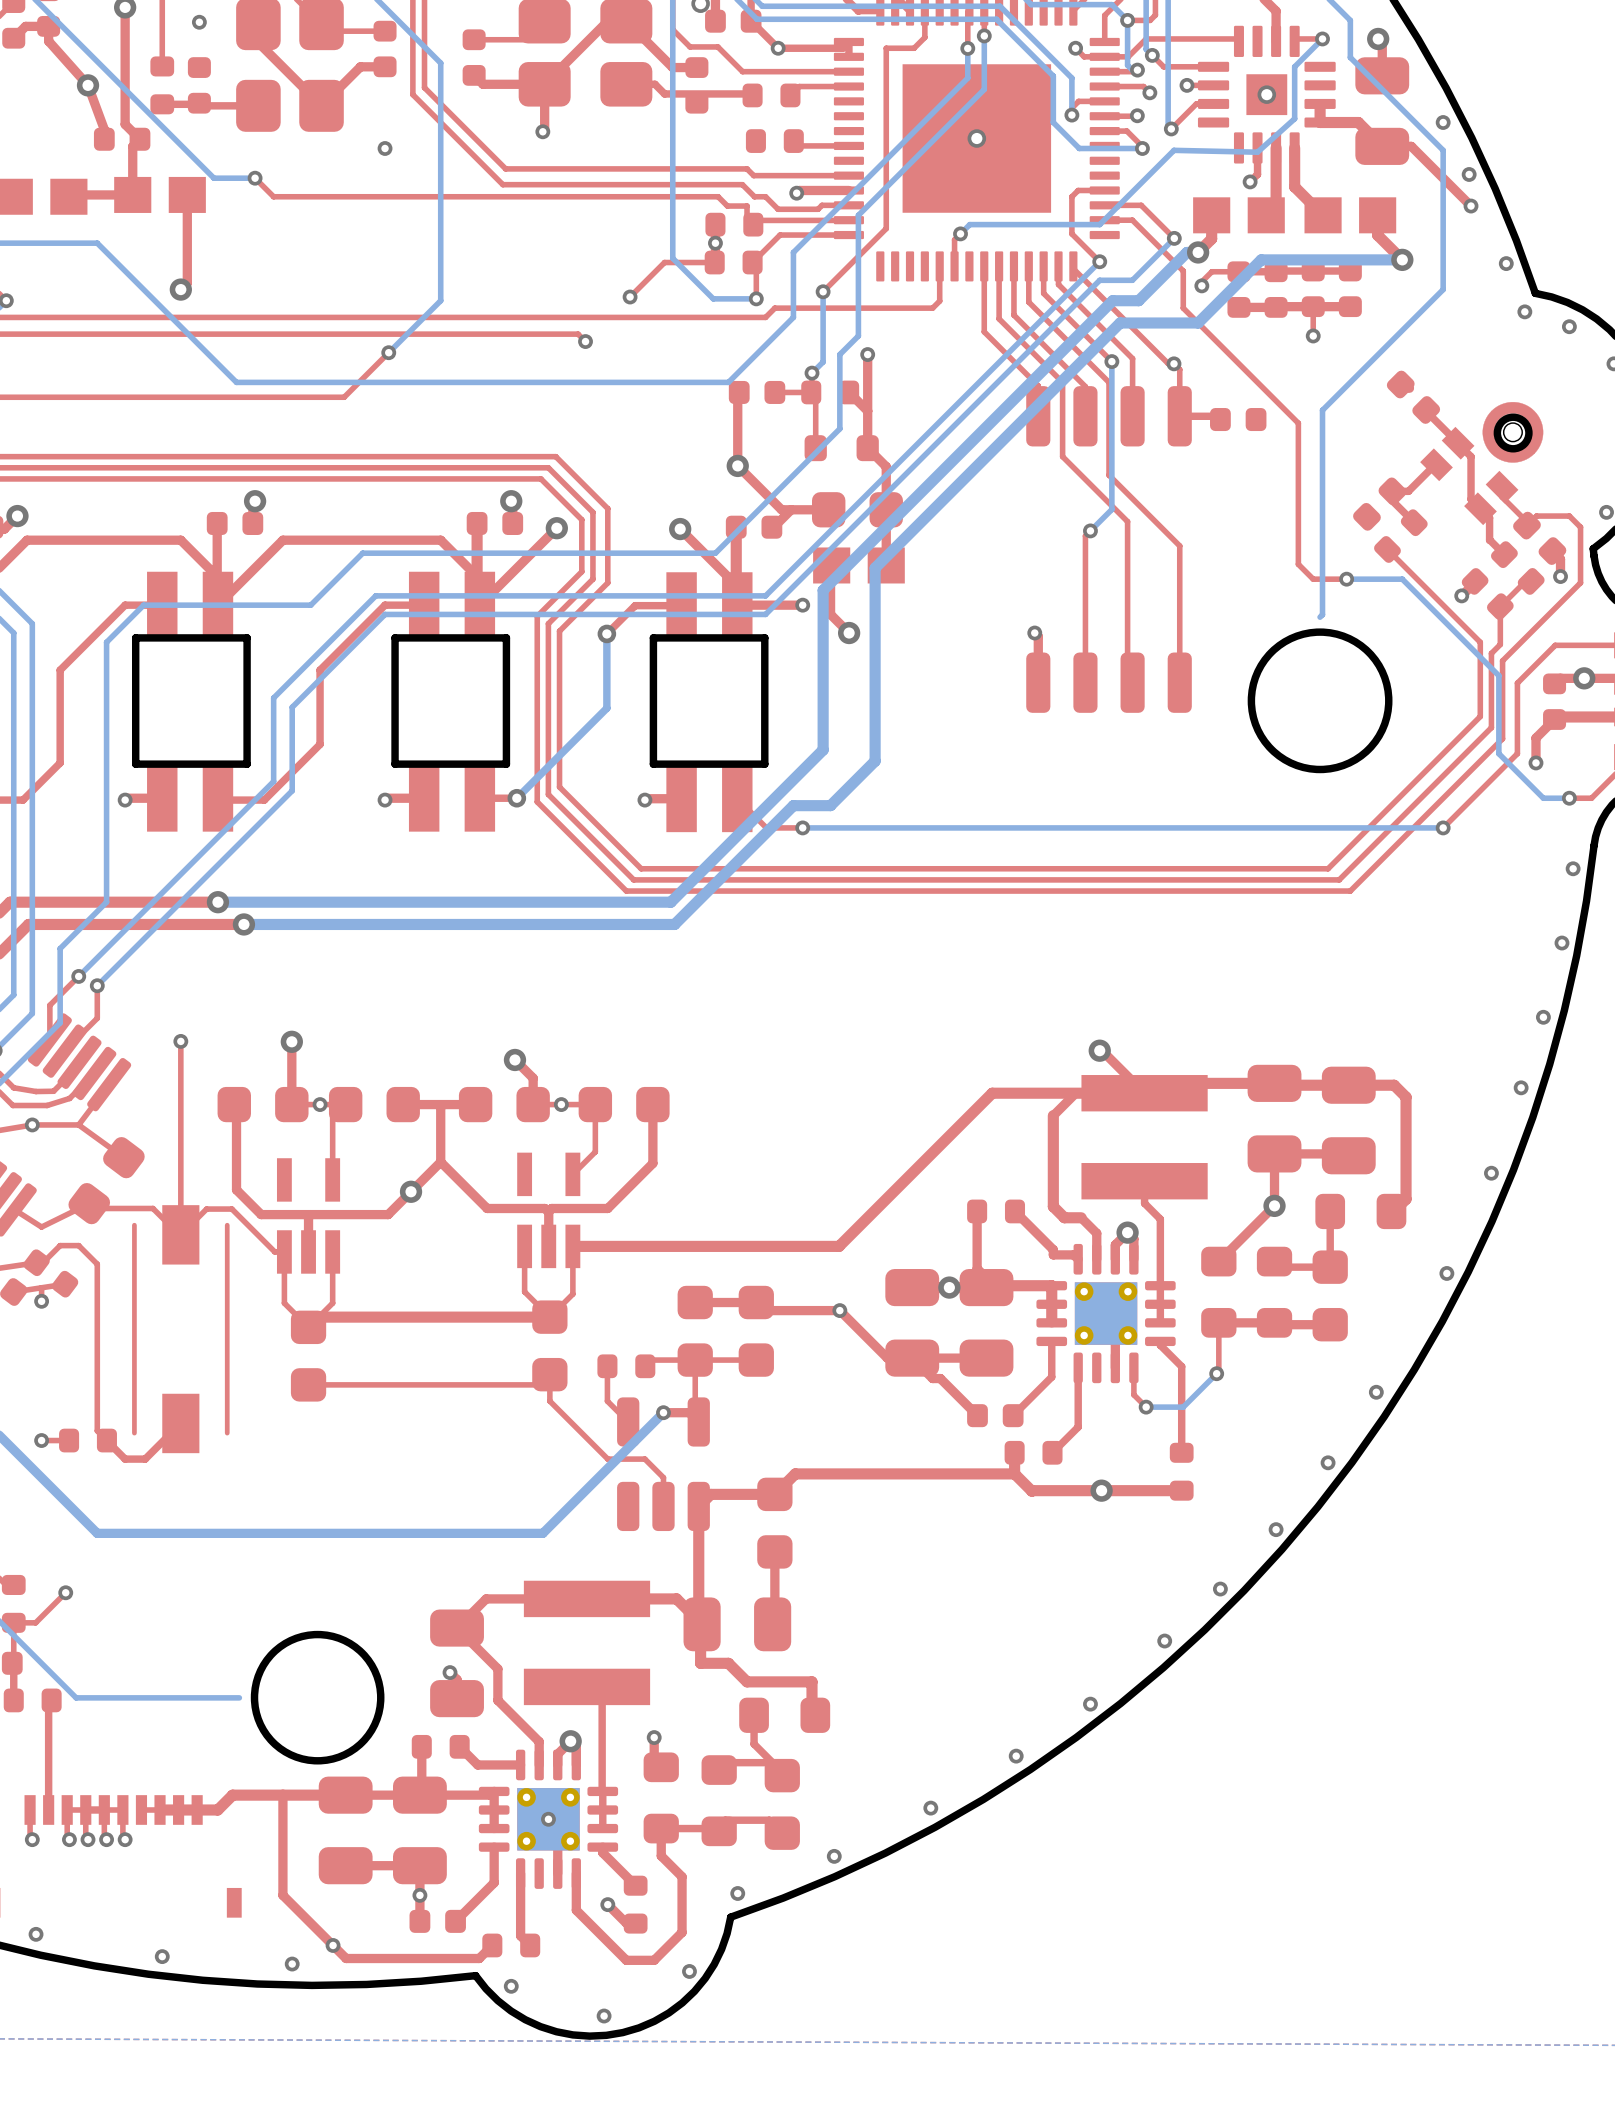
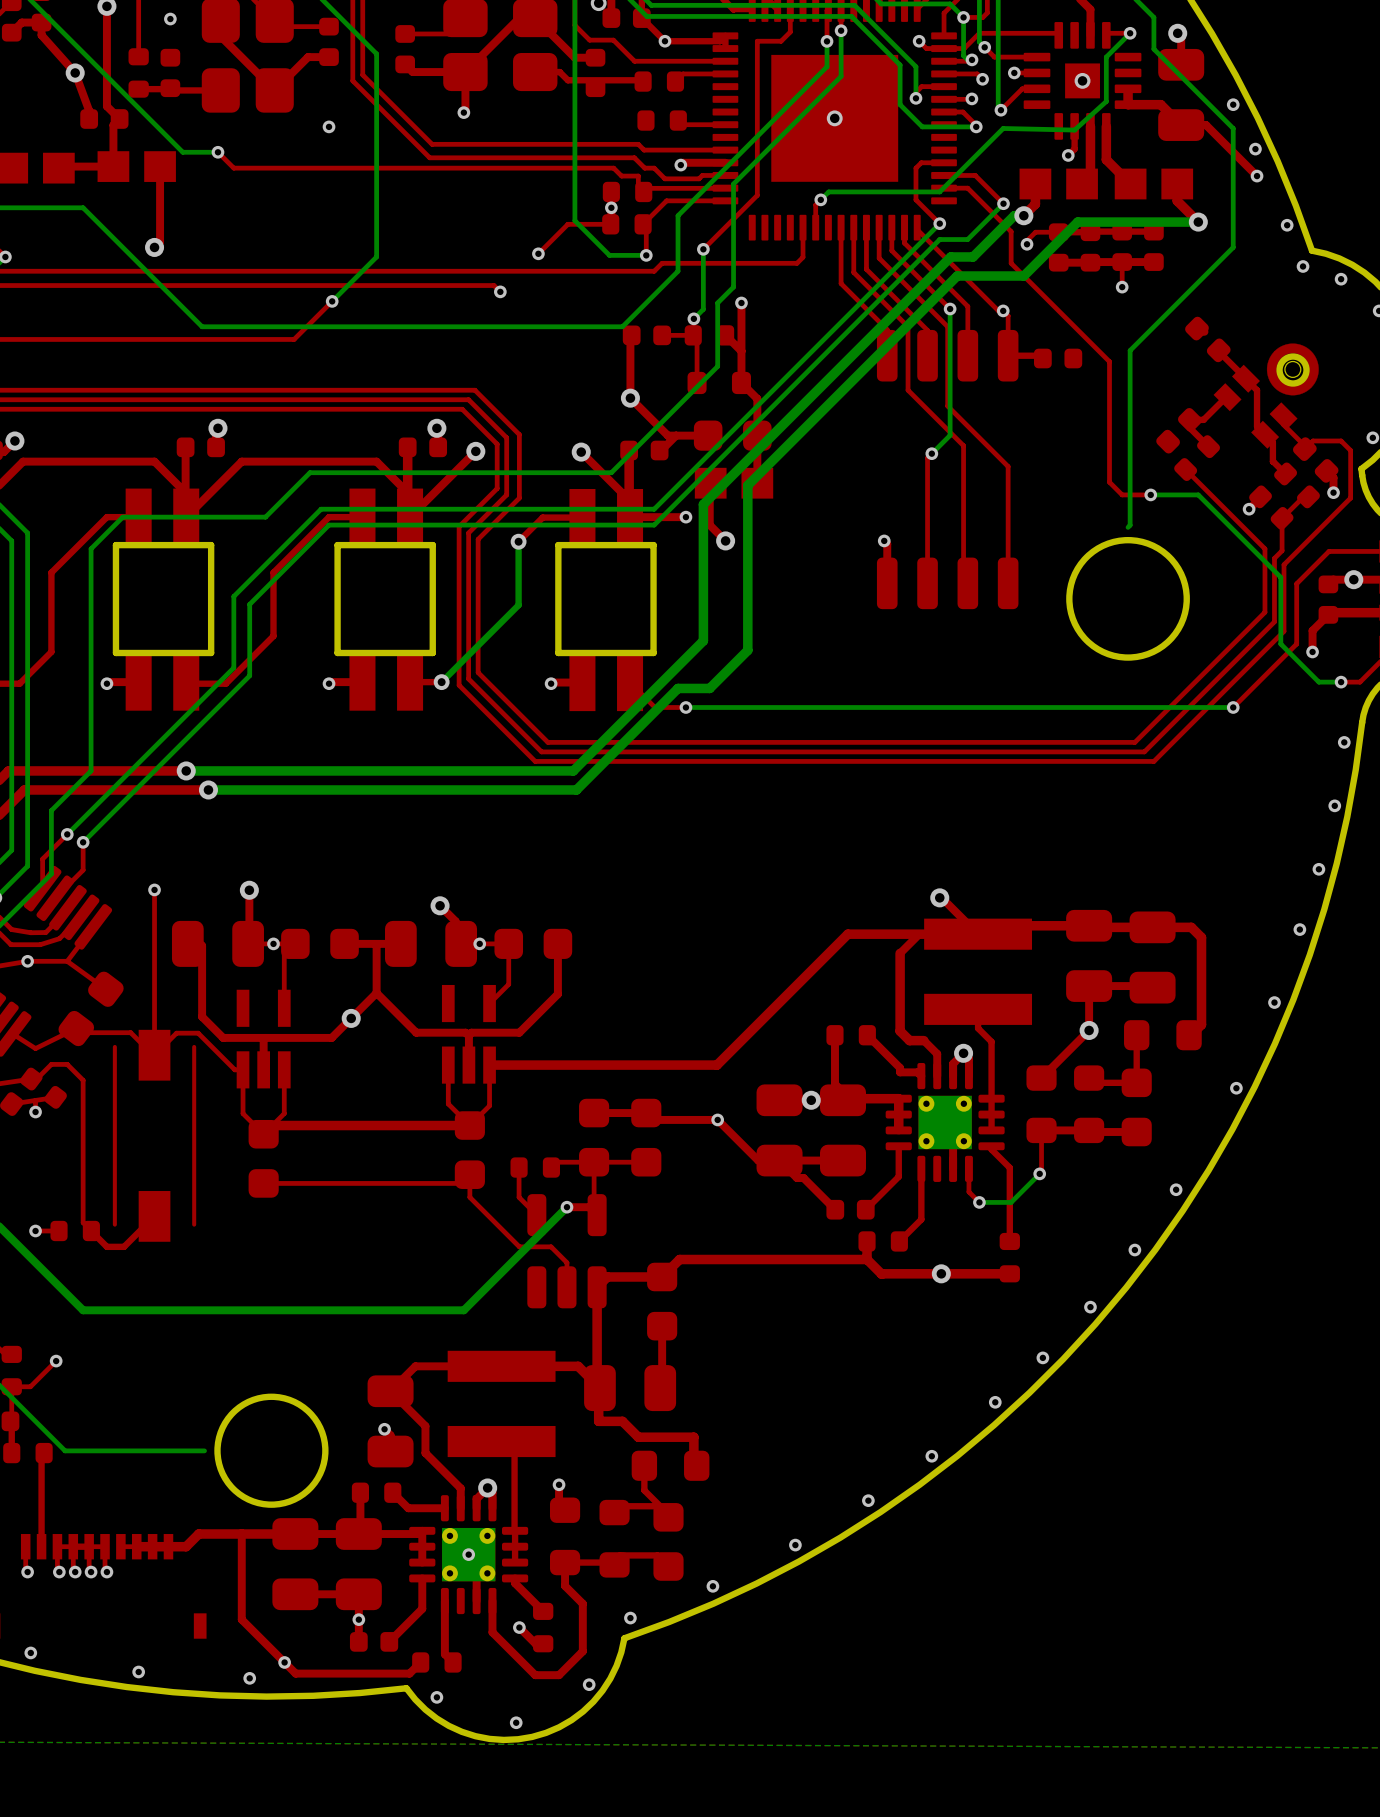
part footprint: [217, 1086, 309, 1123] -> [171, 920, 264, 967]
part footprint: [458, 1086, 550, 1123] -> [385, 920, 478, 967]

